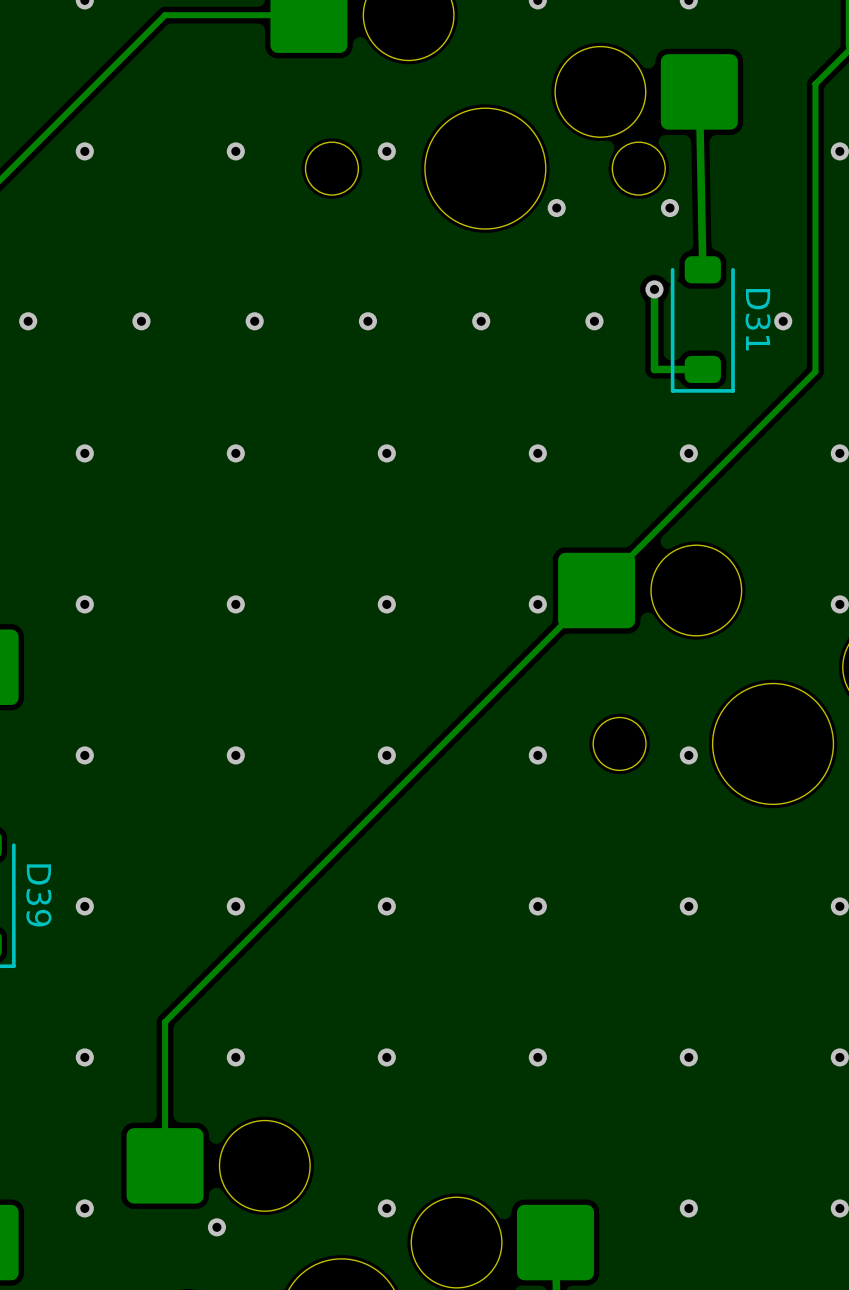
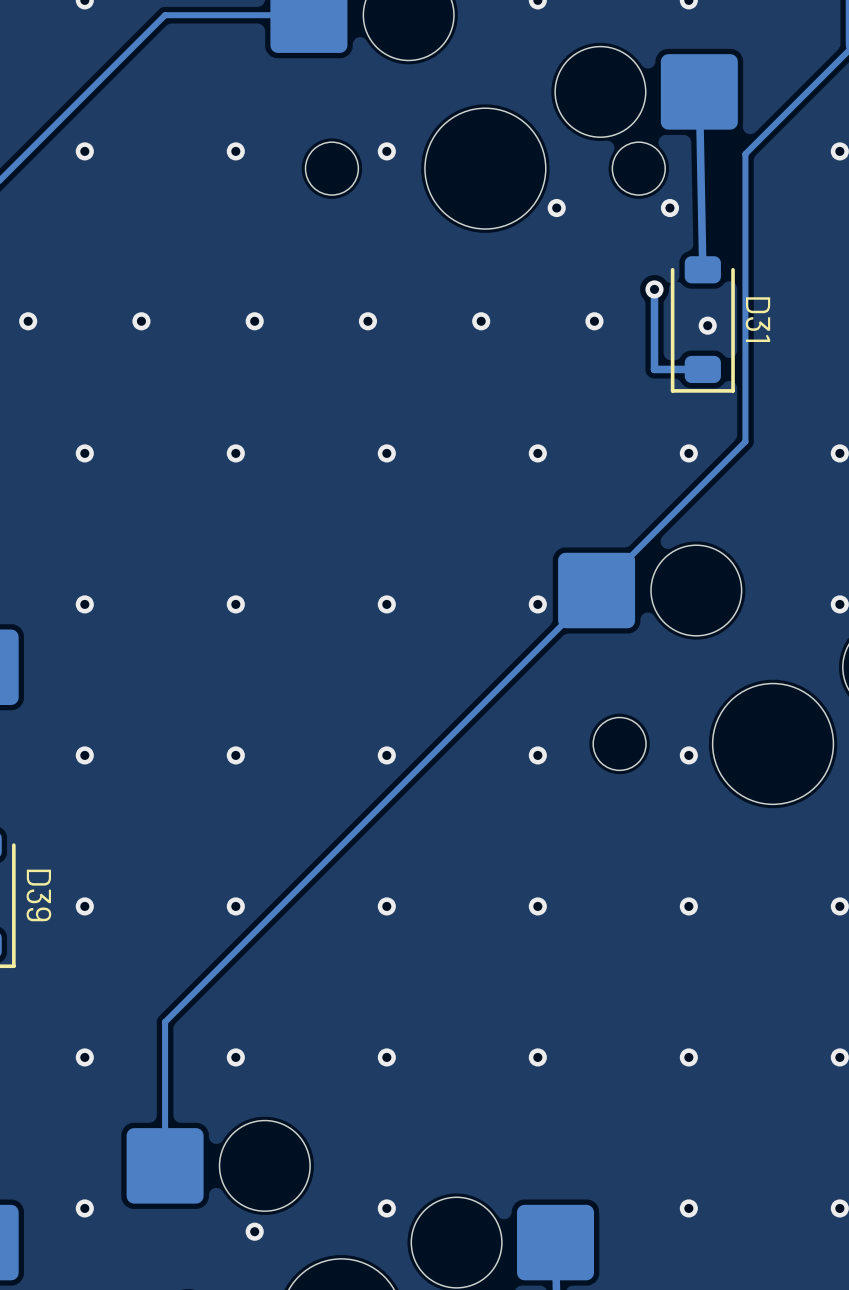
track: (815, 84) (815, 371) (745, 441) -> (815, 84) (745, 154) (745, 441)
via: (783, 321) -> none
via: none -> (707, 325)
via position: (216, 1227) -> (254, 1231)

